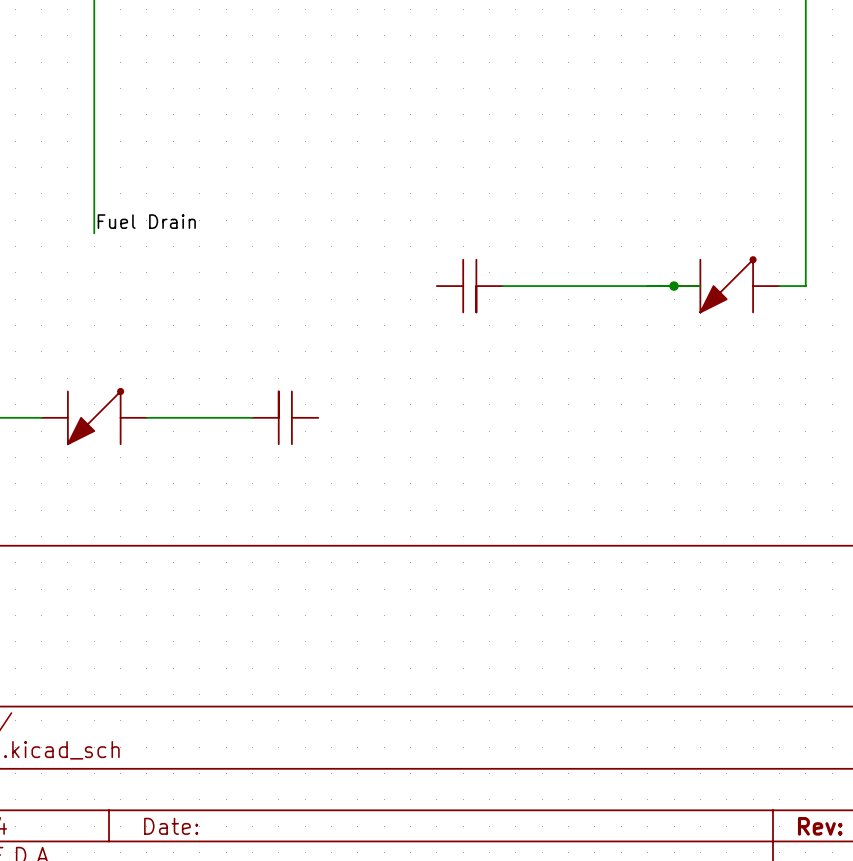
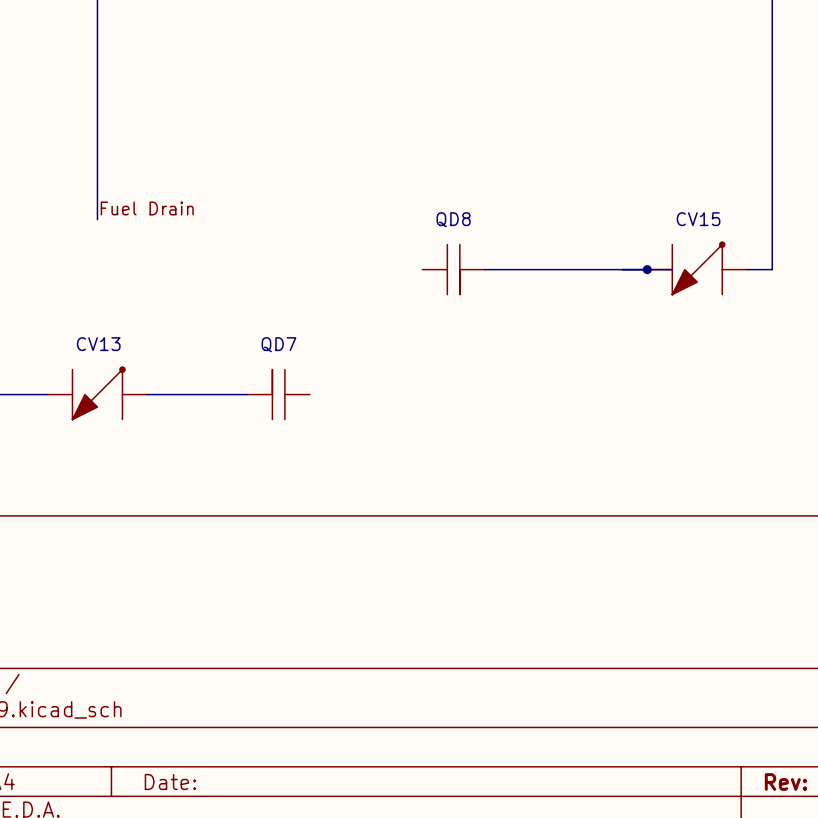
CV15 name: none -> CV15 (698, 219)
QD8 name: none -> QD8 (453, 219)
CV13 name: none -> CV13 (98, 344)
QD7 name: none -> QD7 (278, 344)

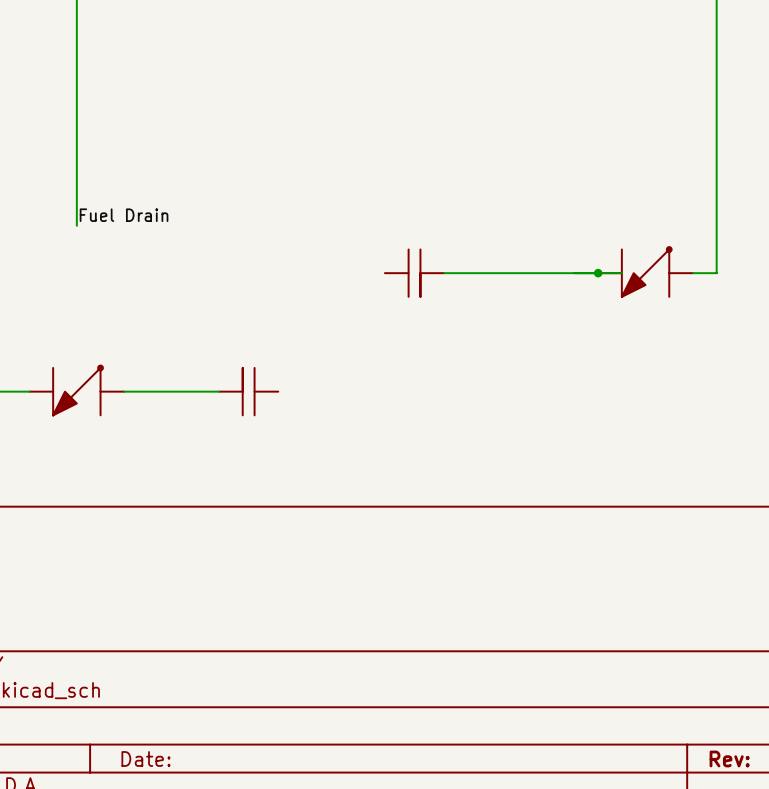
QD8 name: QD8 (453, 219) -> none
CV15 name: CV15 (698, 219) -> none
CV13 name: CV13 (98, 344) -> none
QD7 name: QD7 (278, 344) -> none

